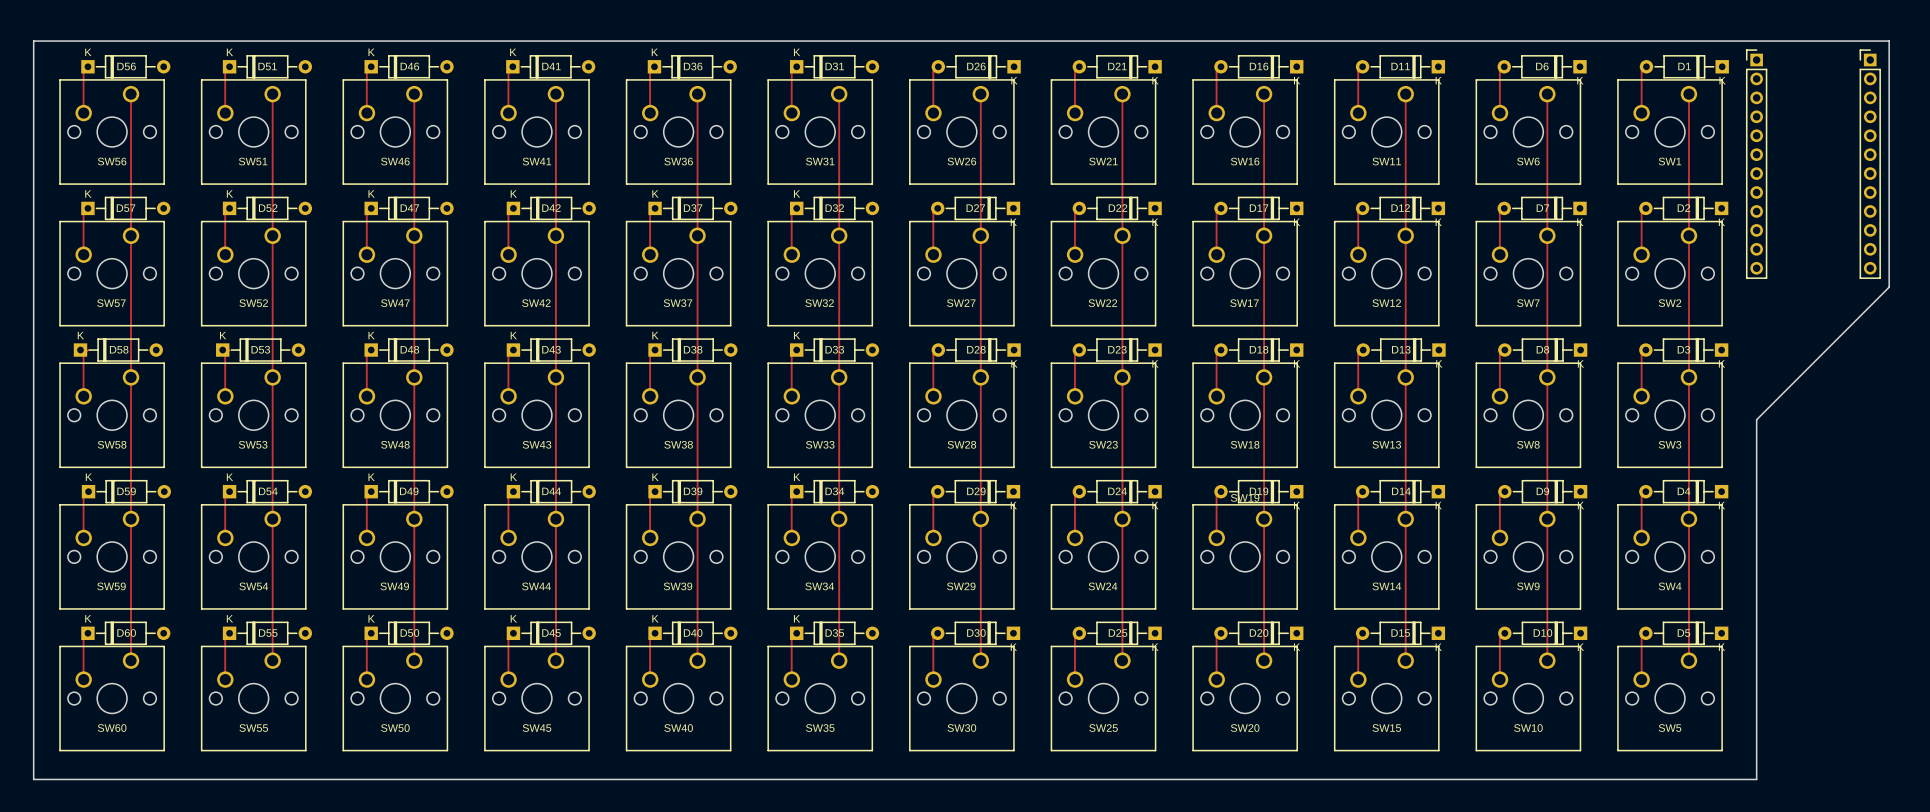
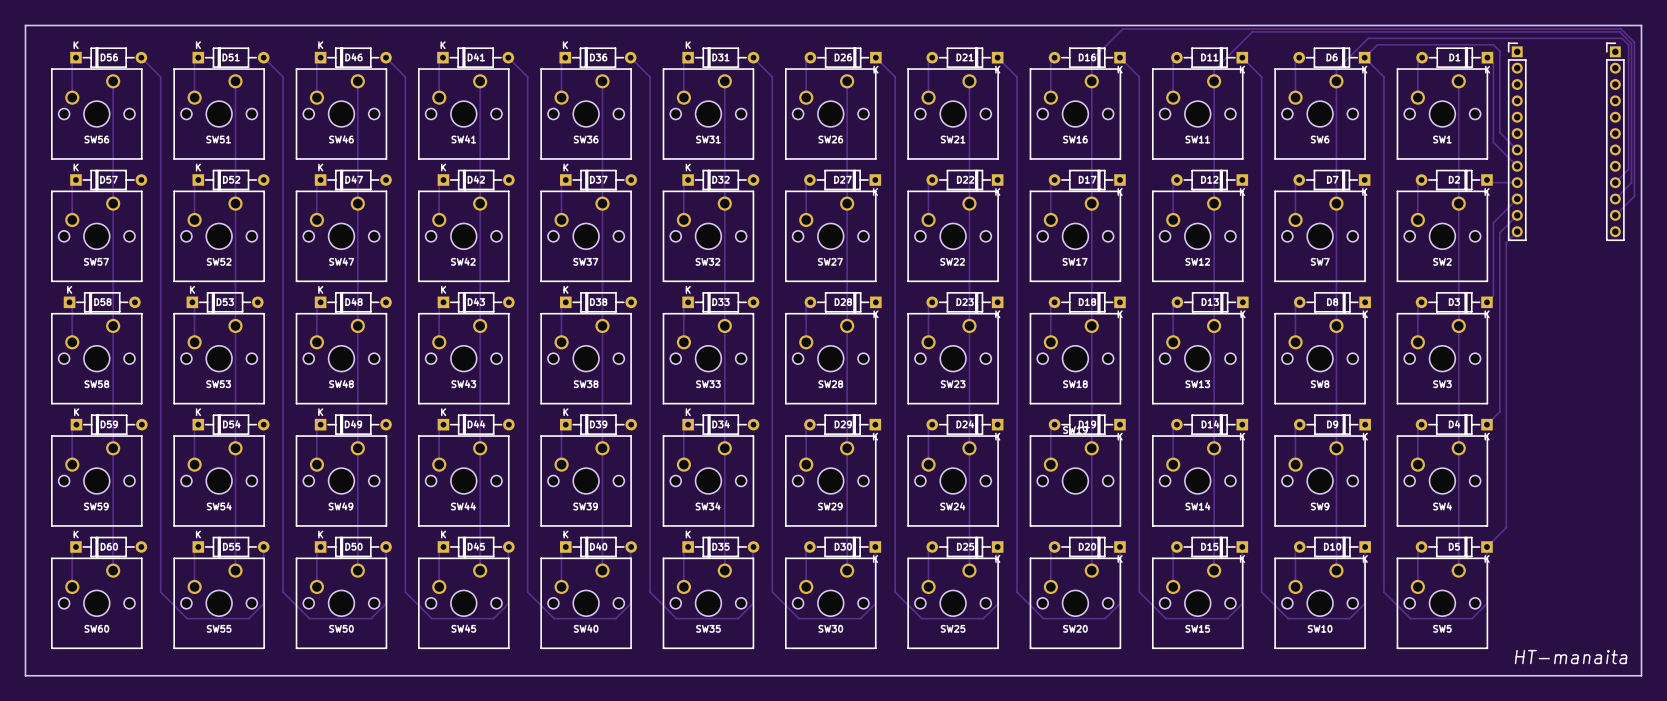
board edge: (33, 41) (33, 779) (1756, 779) (1756, 419) (1889, 287) (1889, 41) (33, 41) -> (25, 25) (25, 675) (1641, 675) (1641, 25) (25, 25)
track: none -> (141, 57) (160, 76) (160, 592) (187, 618) (248, 618) (263, 603) (263, 546)
track: none -> (263, 57) (283, 76) (283, 592) (309, 618) (371, 618) (386, 603) (386, 546)
track: none -> (386, 57) (405, 76) (405, 592) (431, 618) (493, 618) (508, 603) (508, 546)
track: none -> (508, 57) (527, 76) (527, 592) (554, 618) (615, 618) (630, 603) (630, 546)
track: none -> (630, 57) (649, 76) (649, 592) (676, 618) (738, 618) (753, 603) (753, 546)
track: none -> (753, 57) (772, 76) (772, 592) (798, 618) (860, 618) (875, 603) (875, 546)
track: none -> (875, 57) (895, 76) (895, 592) (921, 618) (983, 618) (998, 603) (998, 546)
track: none -> (997, 57) (1016, 76) (1016, 592) (1043, 618) (1105, 618) (1119, 603) (1119, 546)
track: none -> (1119, 57) (1139, 76) (1139, 592) (1165, 618) (1227, 618) (1242, 603) (1242, 546)
track: none -> (1242, 57) (1261, 76) (1261, 592) (1288, 618) (1349, 618) (1364, 603) (1364, 546)
track: none -> (1487, 57) (1493, 63) (1493, 142) (1517, 166)
track: none -> (1091, 81) (1091, 60) (1122, 29) (1621, 29) (1634, 42) (1634, 196) (1615, 215)
track: none -> (1214, 81) (1214, 70) (1252, 31) (1619, 31) (1631, 43) (1631, 182) (1615, 198)
track: none -> (1336, 81) (1336, 70) (1368, 38) (1622, 38) (1628, 44) (1628, 169) (1615, 182)
track: none -> (1517, 149) (1499, 132) (1499, 51) (1493, 44) (1377, 44) (1364, 57) (1383, 76) (1383, 592) (1410, 618) (1472, 618) (1486, 603) (1486, 546) (1506, 527) (1506, 242) (1517, 231)
track: none -> (1486, 180) (1489, 182) (1517, 182)
track: none -> (1517, 198) (1493, 222) (1493, 295) (1486, 302)
track: none -> (1517, 215) (1499, 232) (1499, 411) (1486, 424)
text: none -> HT-manaita (1571, 657)

